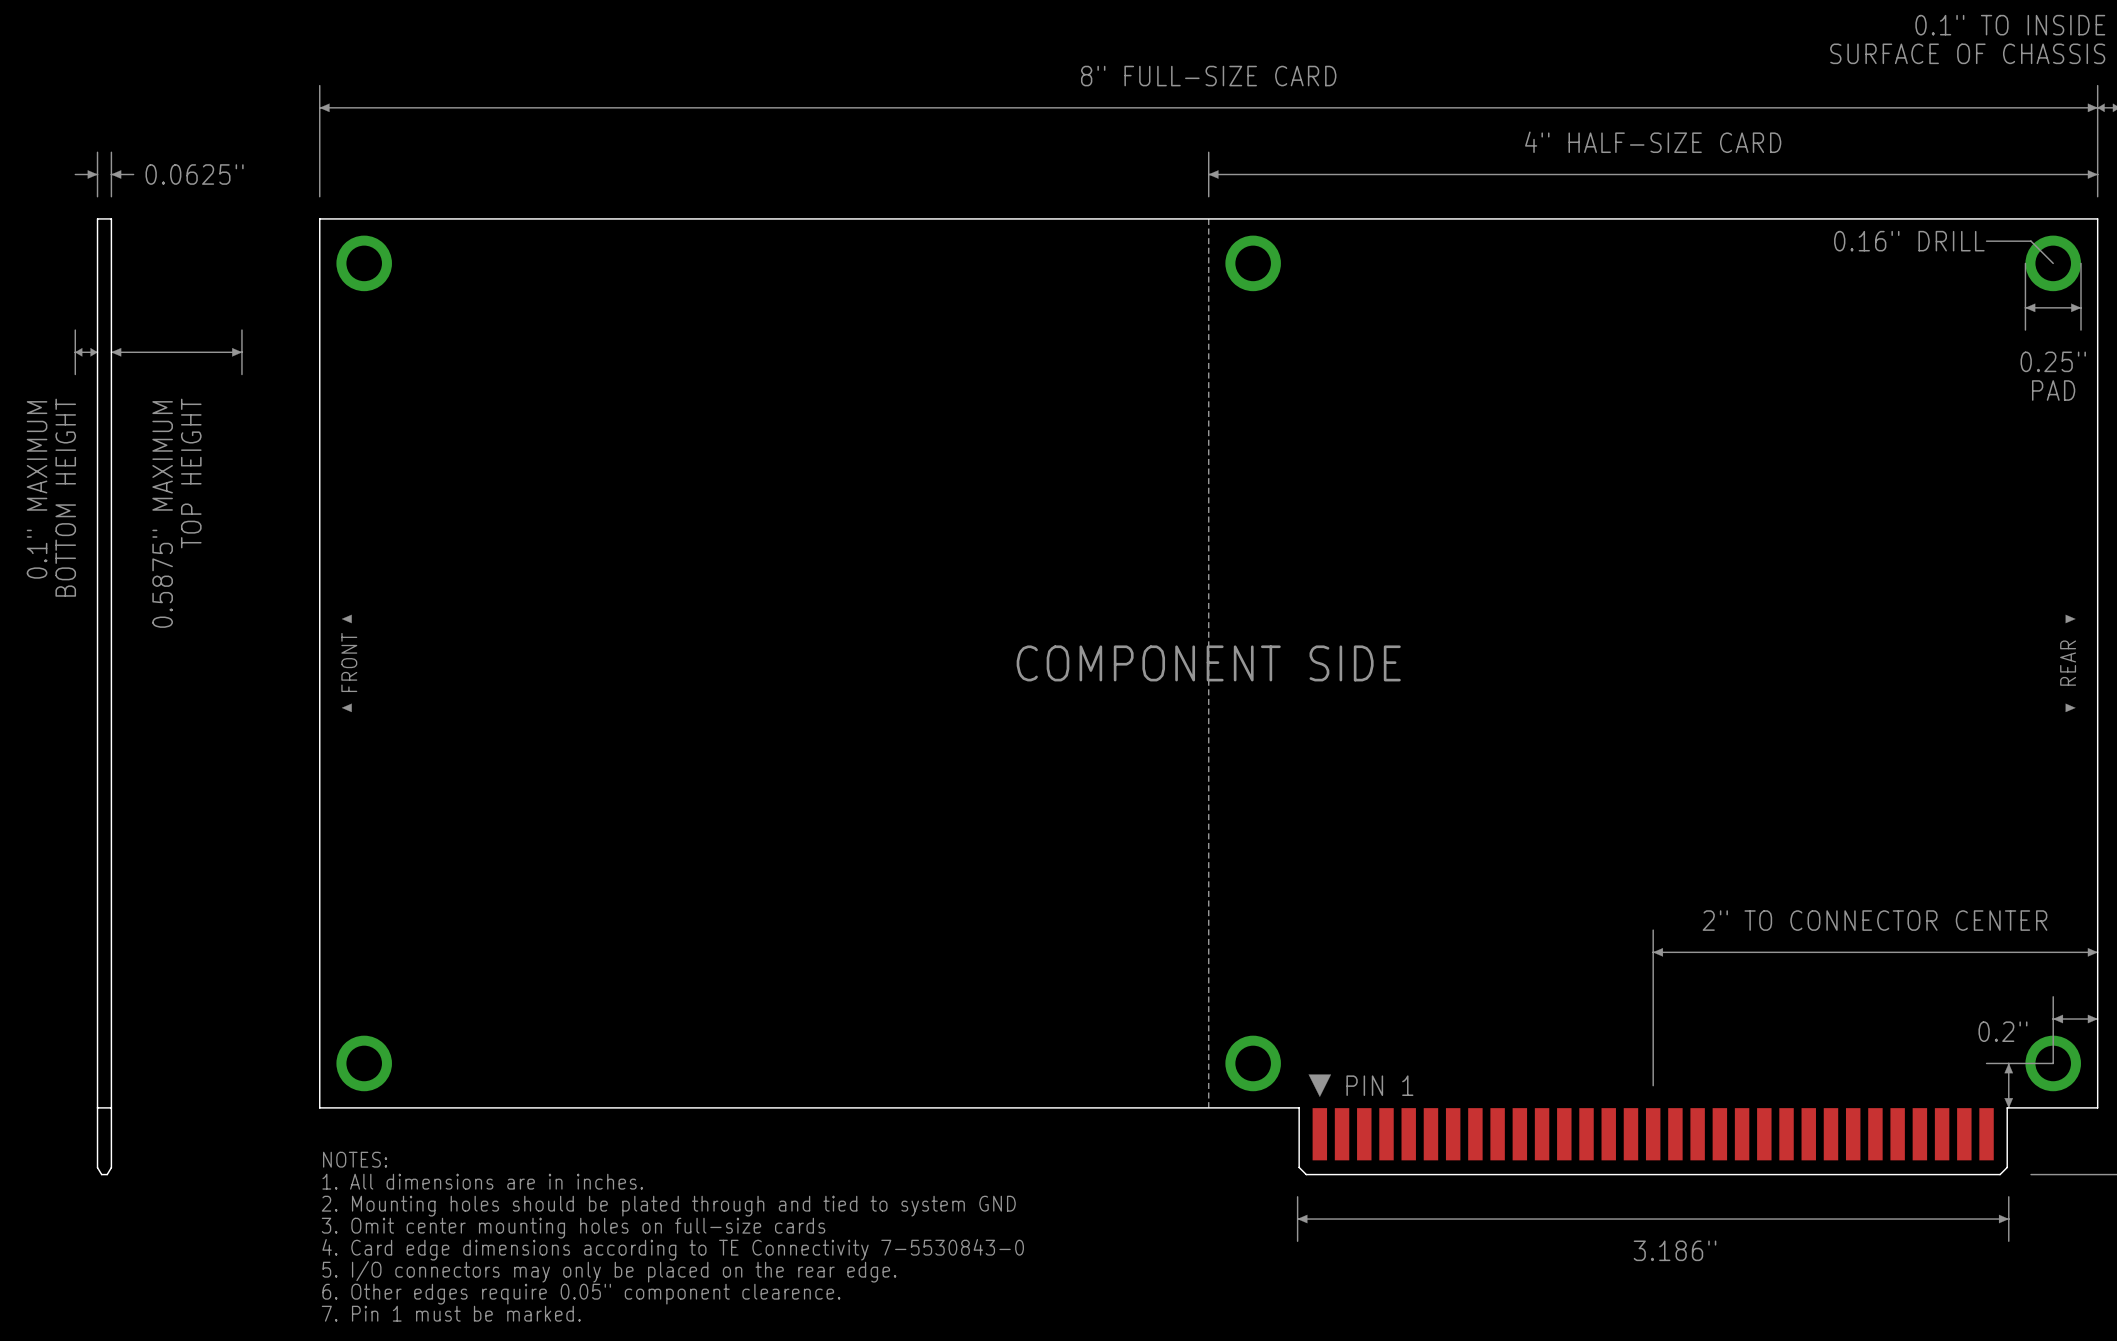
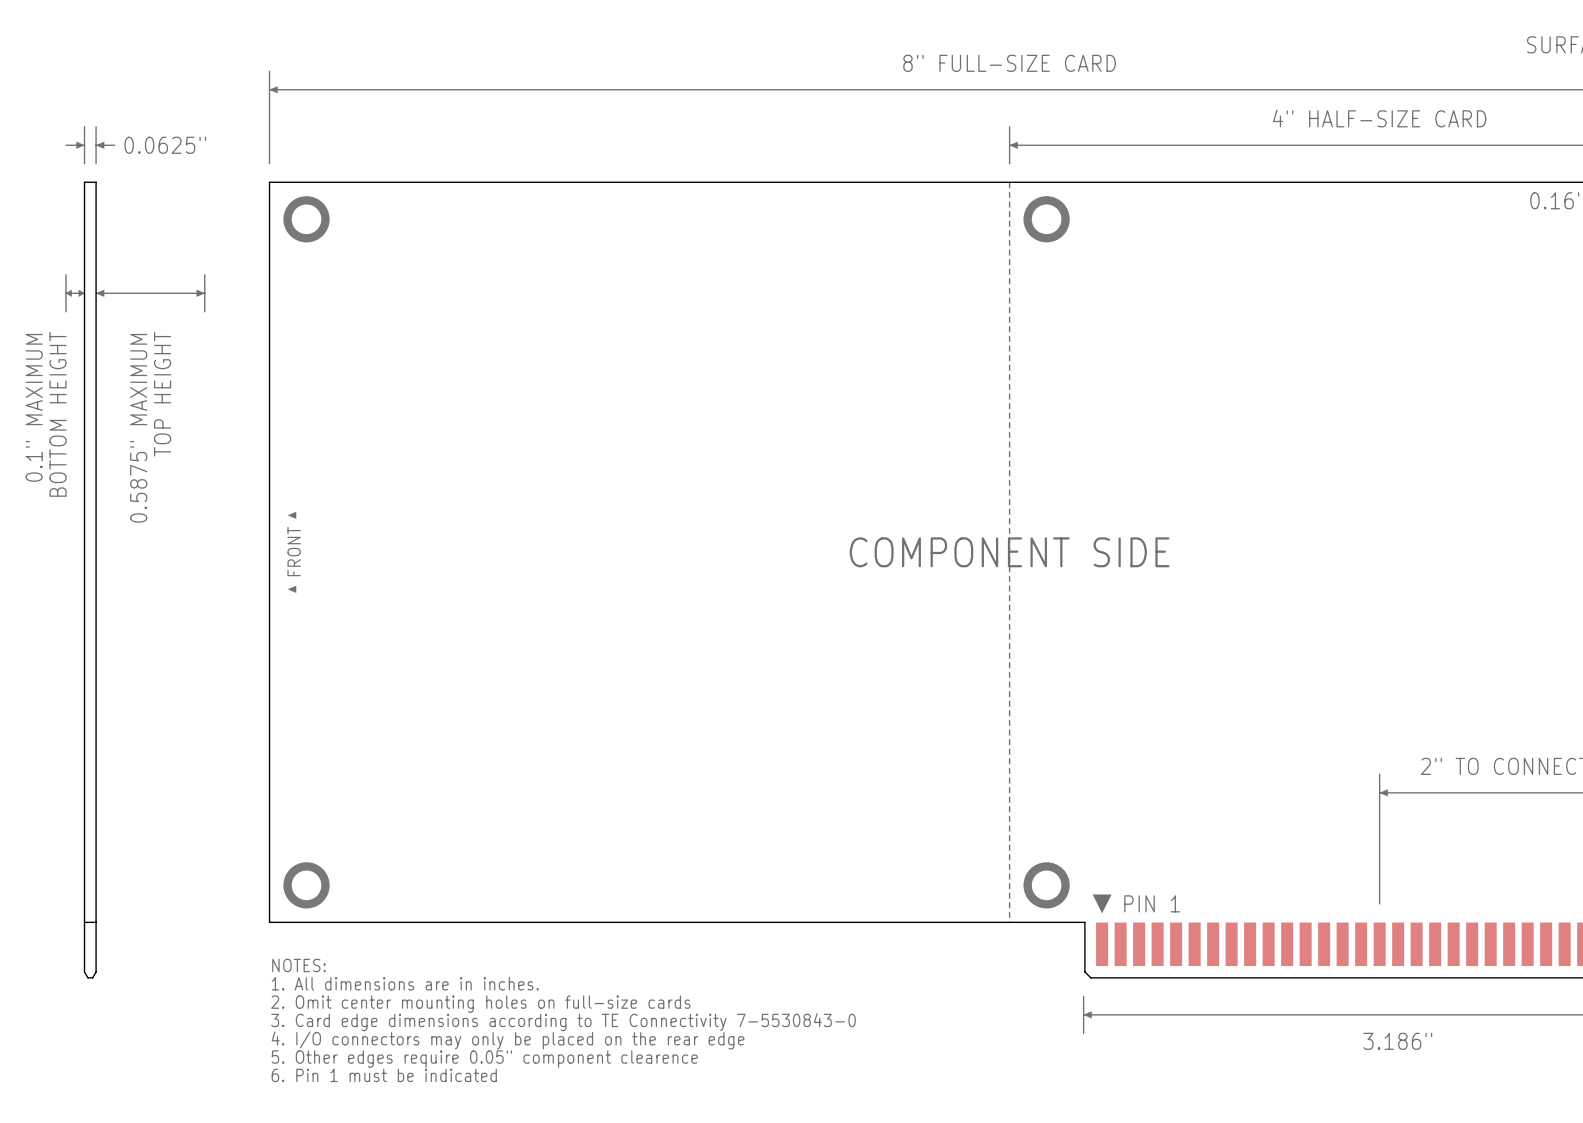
text: 2. Mounting holes should be plated through and tied to system GND (668, 1206) -> 2. Omit center mounting holes on full-size cards (480, 1004)
text: 3. Omit center mounting holes on full-size cards (573, 1228) -> 3. Card edge dimensions according to TE Connectivity 7-5530843-0 (563, 1022)
text: 4. Card edge dimensions according to TE Connectivity 7-5530843-0 (673, 1249) -> 4. I/O connectors may only be placed on the rear edge (508, 1040)
text: 5. I/O connectors may only be placed on the rear edge. (609, 1271) -> 5. Other edges require 0.05" component clearence (484, 1059)
text: 6. Other edges require 0.05" component clearence. (581, 1294) -> 6. Pin 1 must be indicated (384, 1075)
text: 7. Pin 1 must be marked. (451, 1313) -> none

